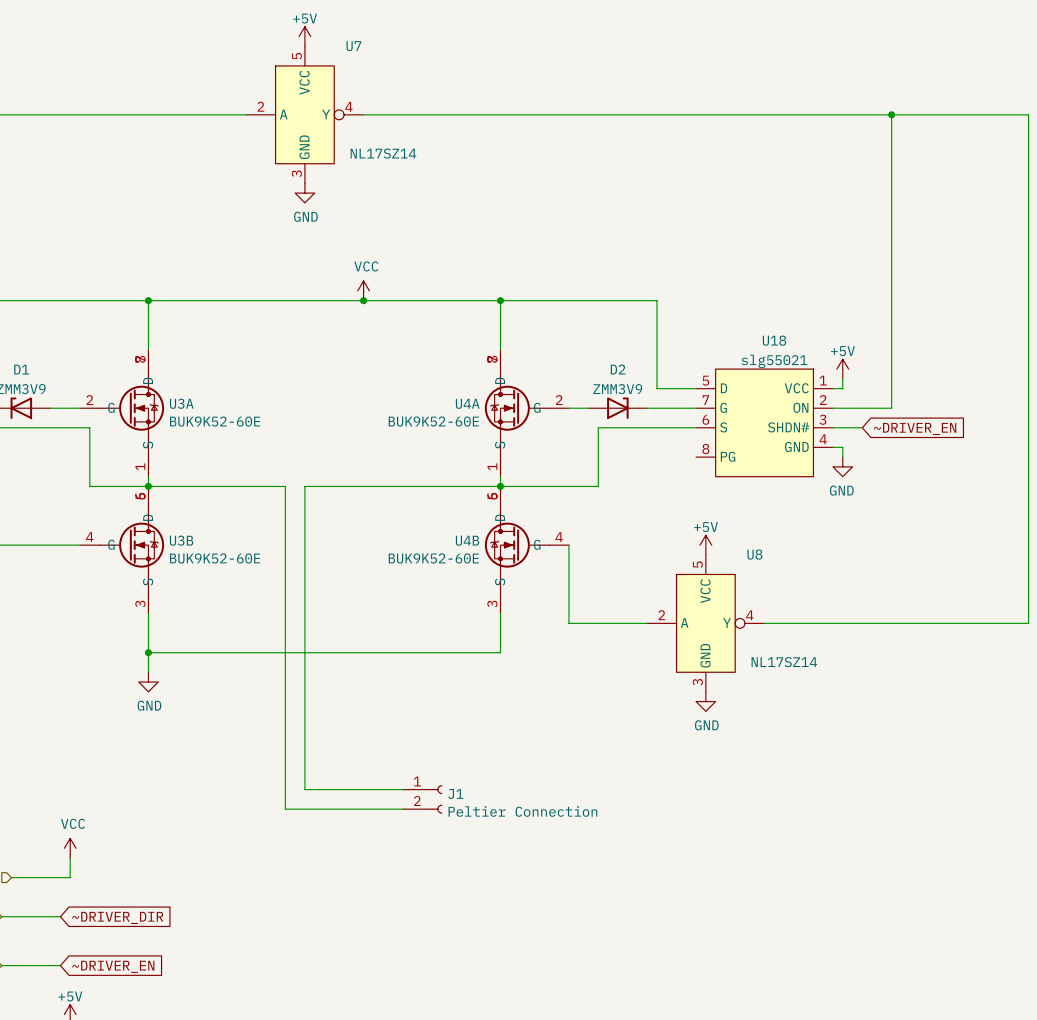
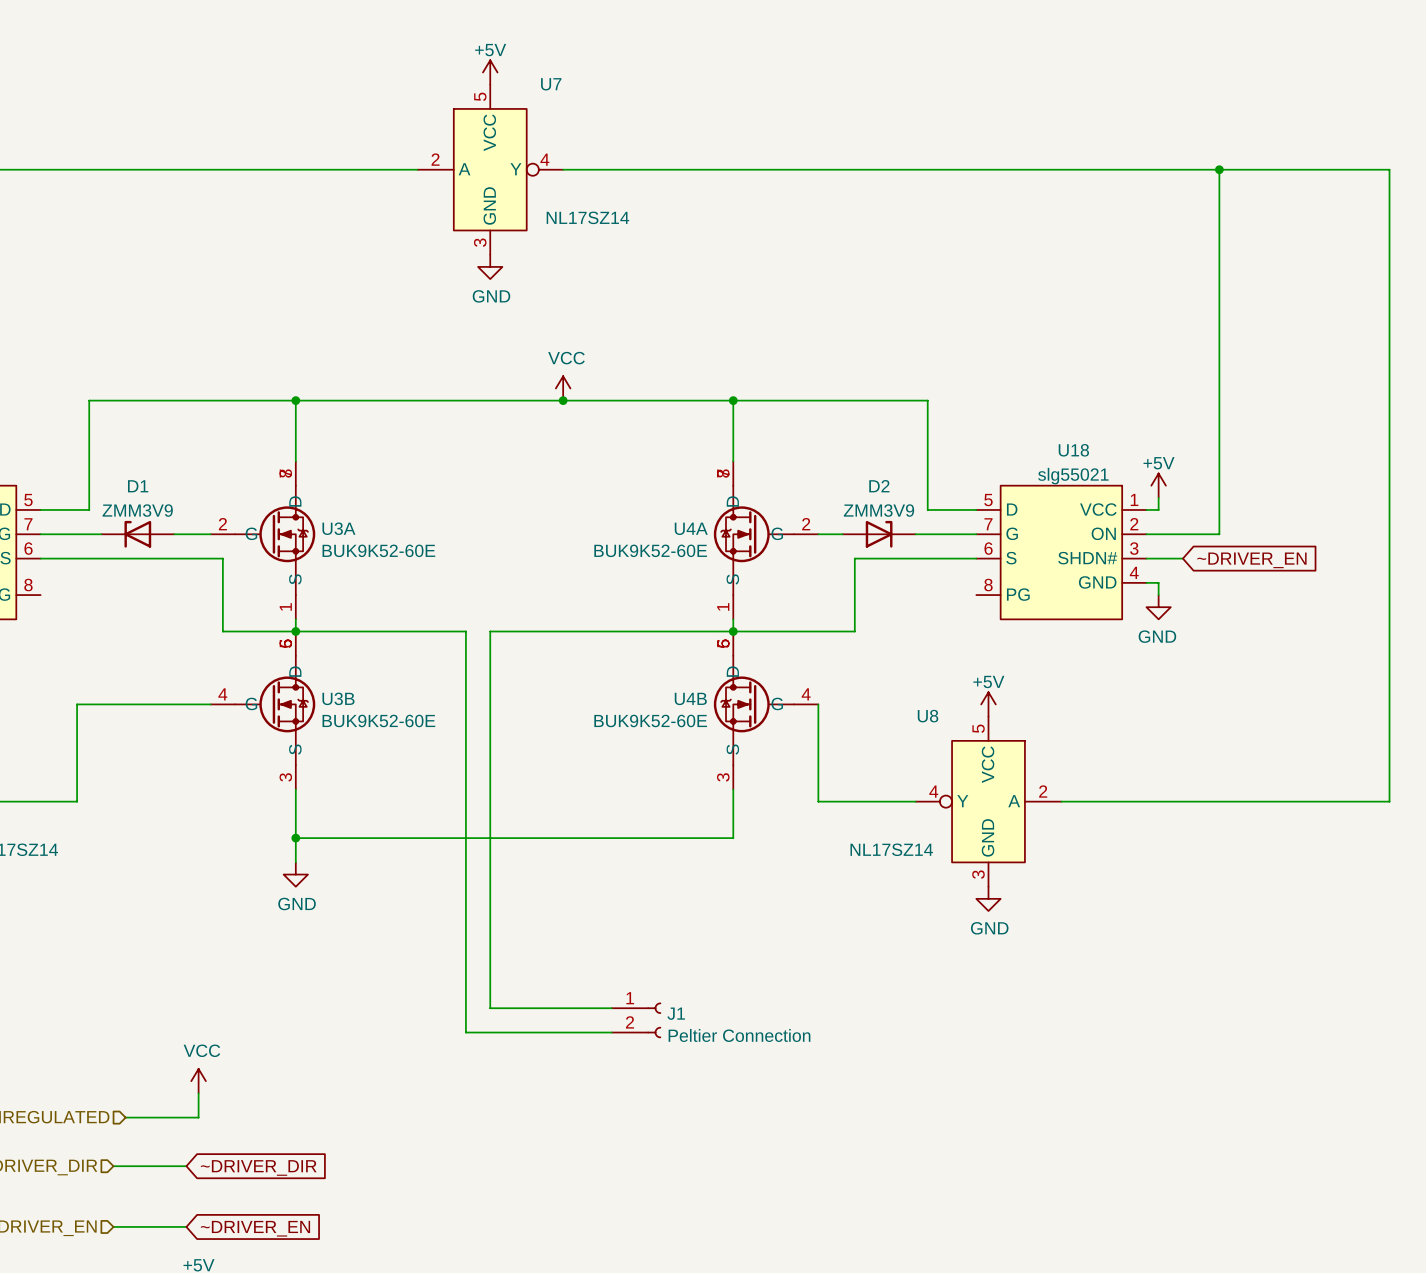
U8 flip: as is (705, 623) -> left-right (988, 801)

